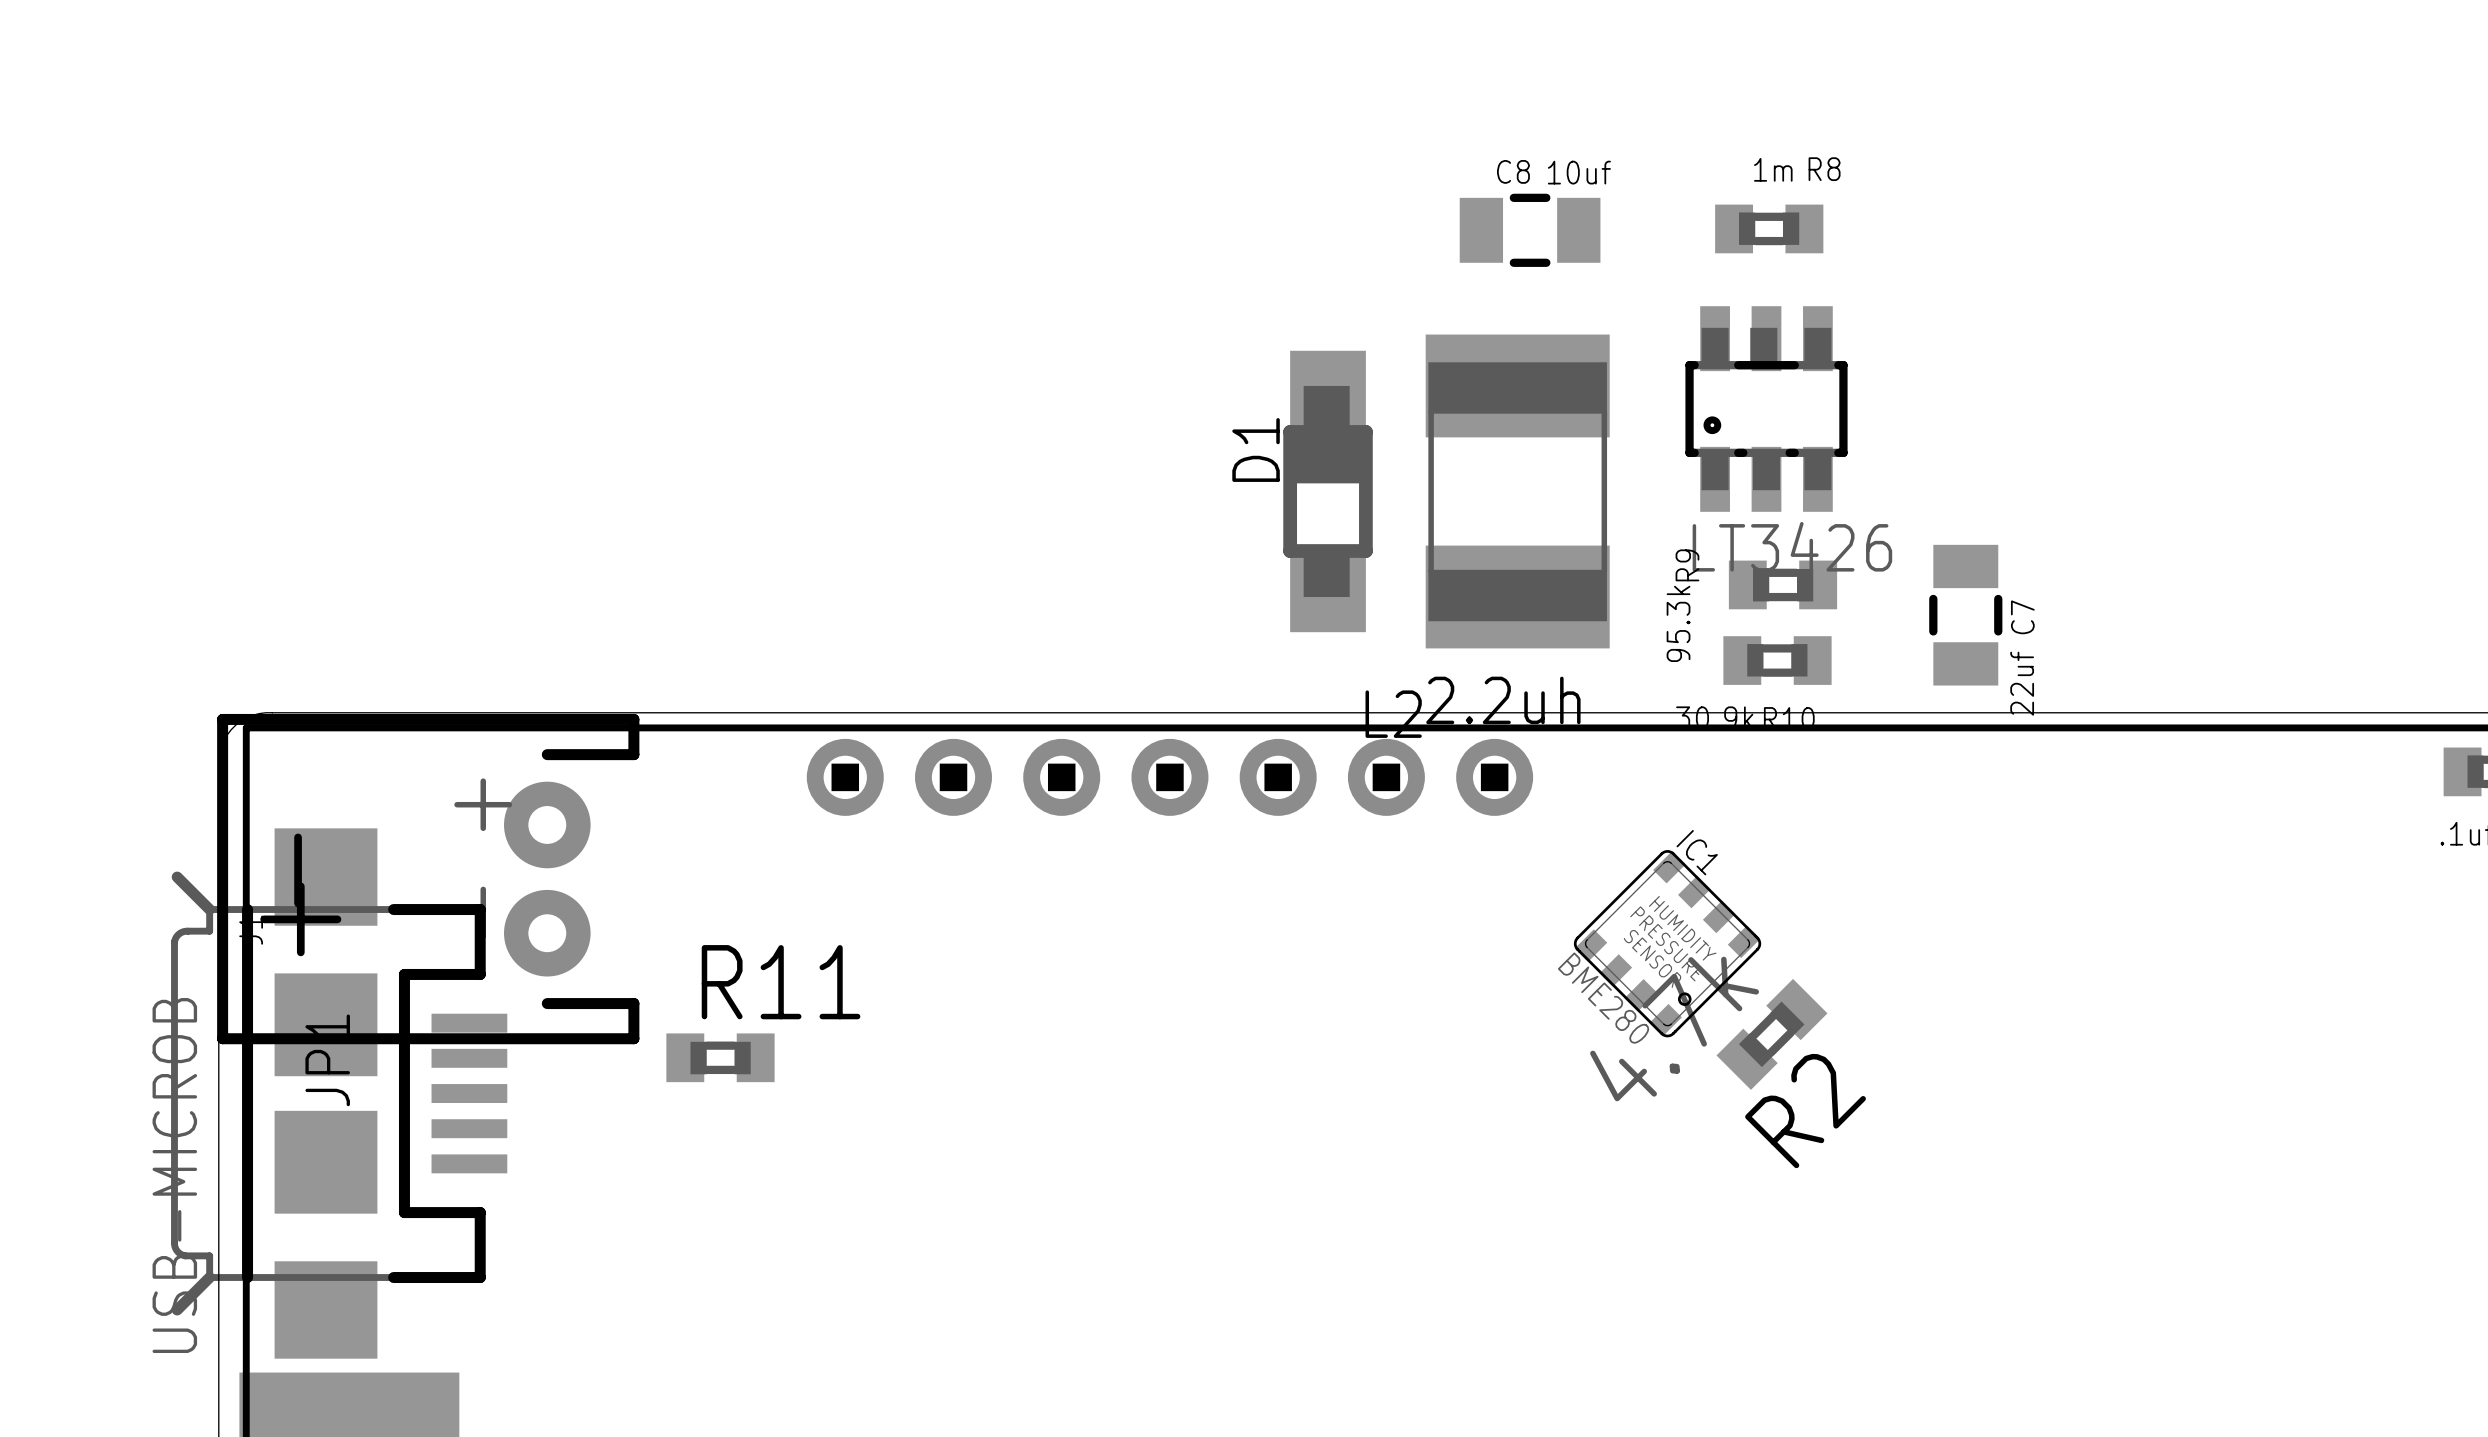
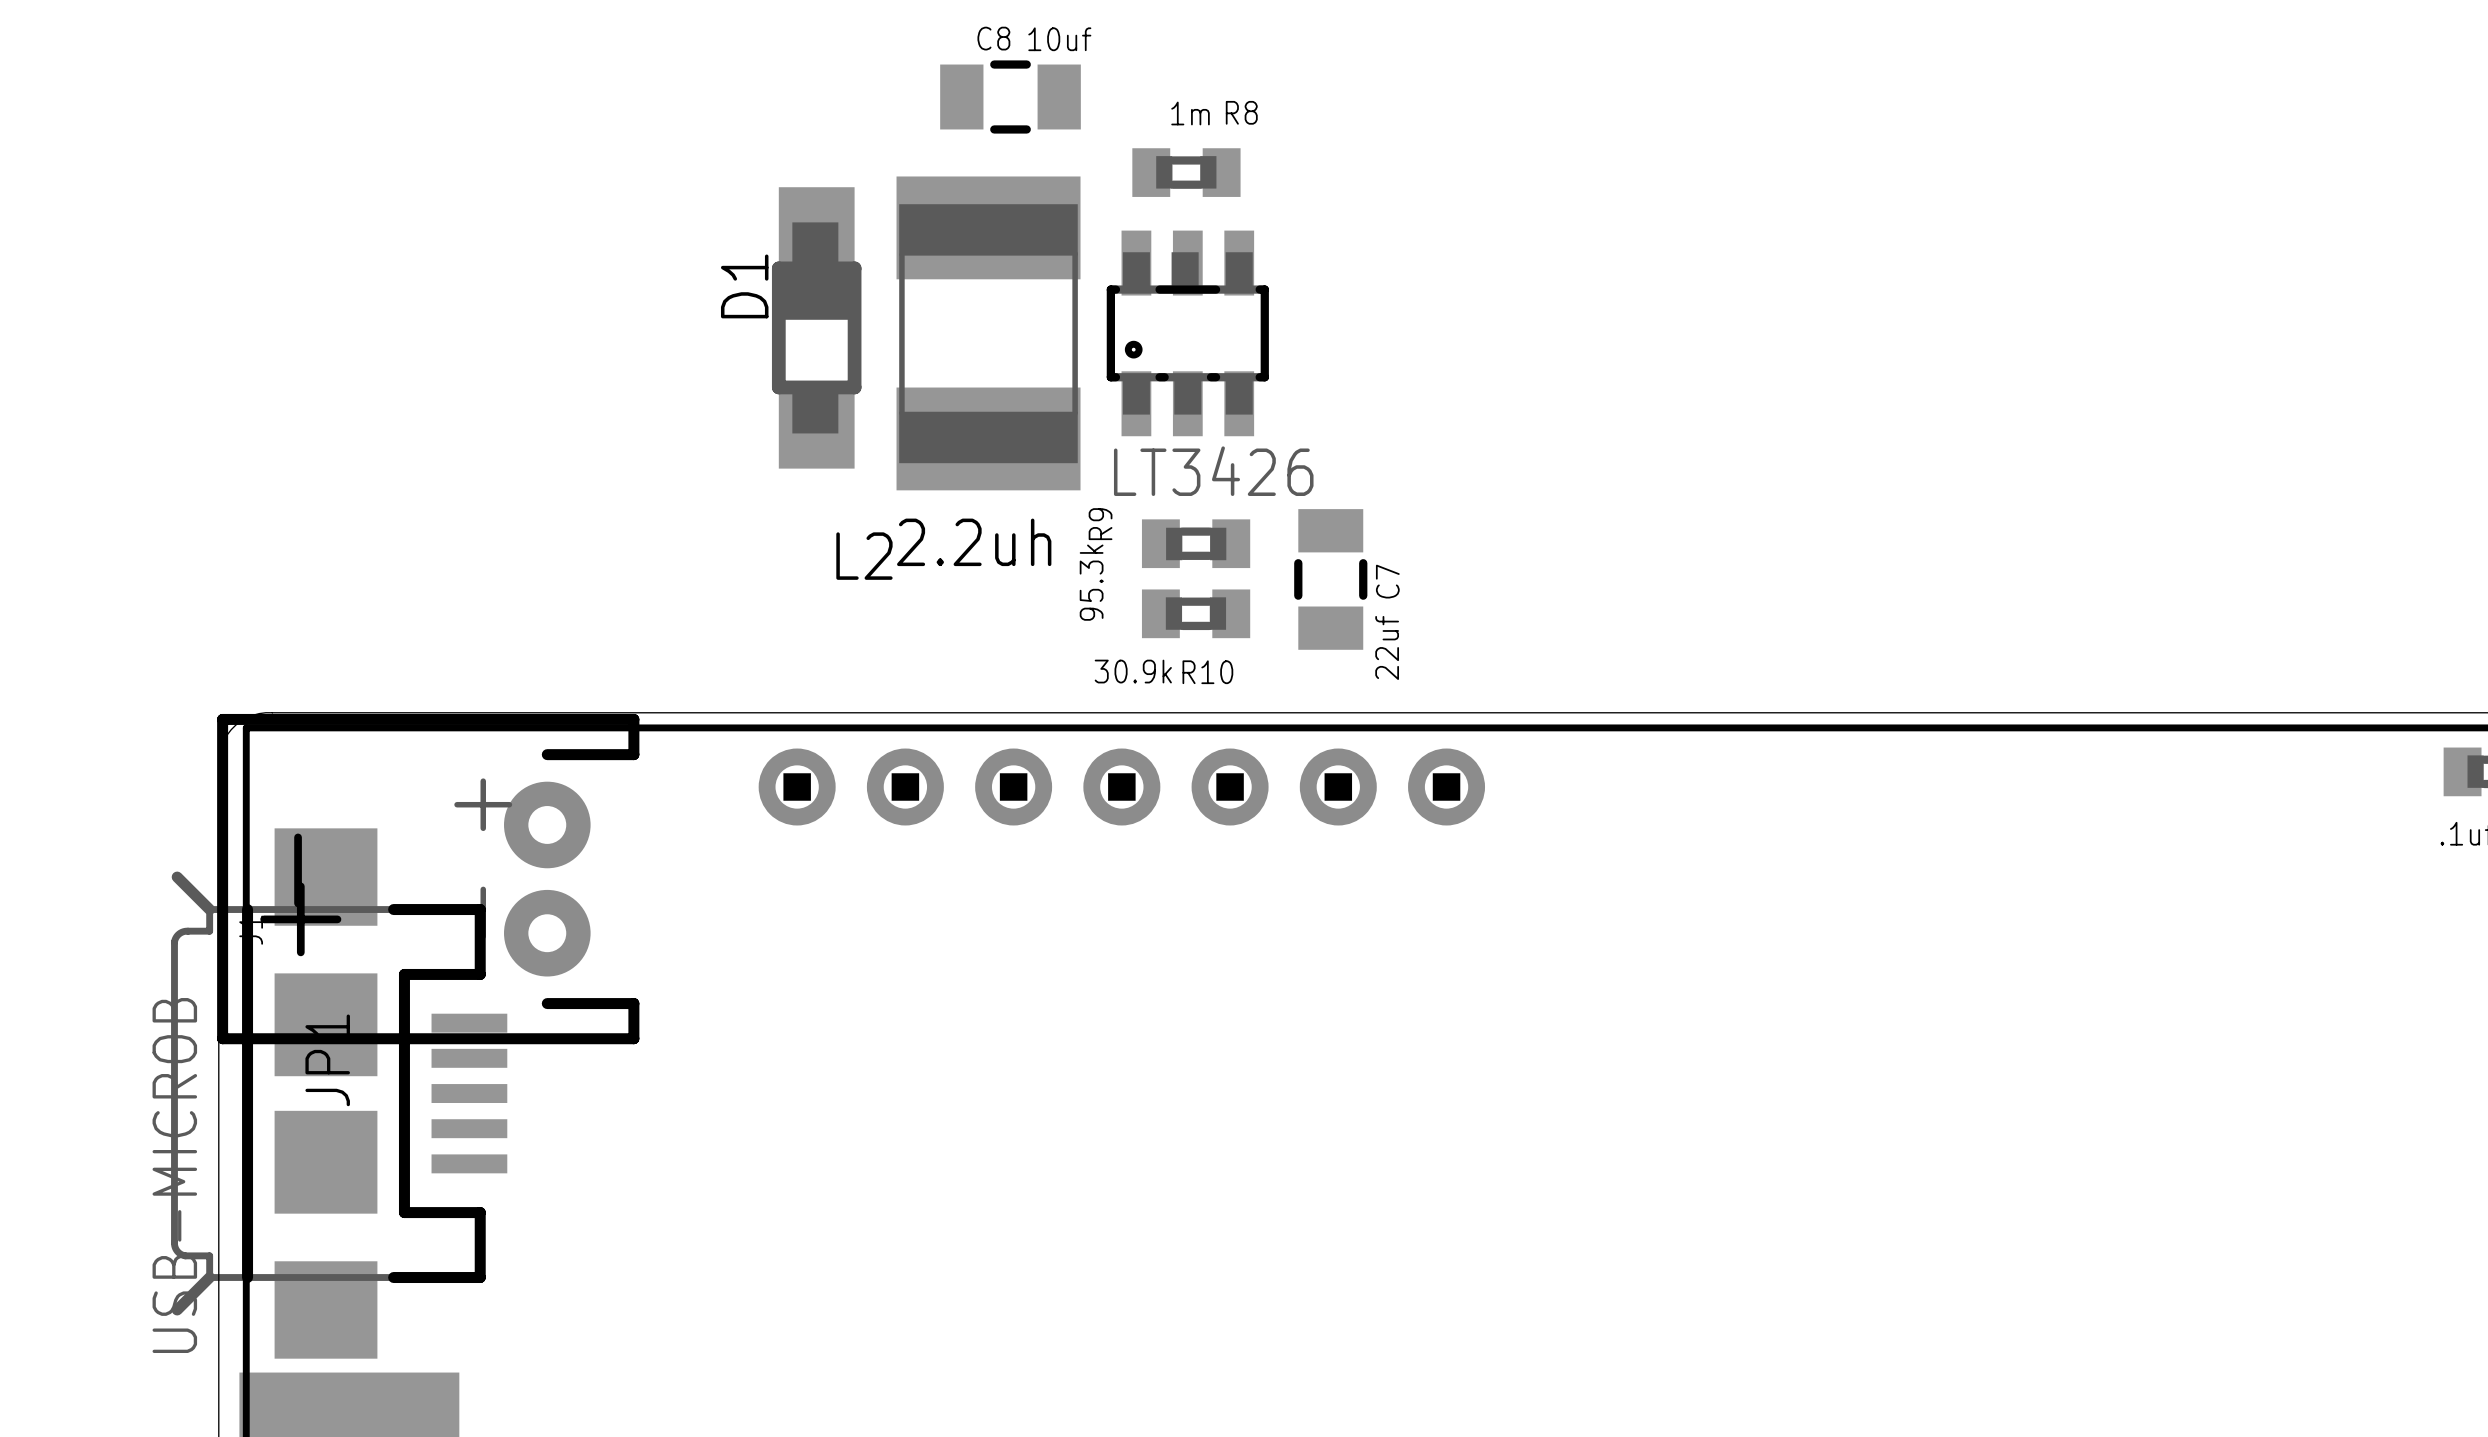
R8 position: (1769, 228) -> (1186, 172)
C8 position: (1530, 230) -> (1010, 96)
part position: (1766, 409) -> (1187, 333)
D1 position: (1328, 491) -> (816, 327)
L2 position: (1517, 491) -> (988, 333)
R9 position: (1782, 584) -> (1196, 543)
C7 position: (1965, 615) -> (1330, 579)
R10 position: (1777, 660) -> (1196, 613)
part position: (1169, 777) -> (1121, 787)
IC1: BME280 (1667, 943) -> none
R2: 4.7k (1771, 1034) -> none
R11: (720, 1057) -> none

